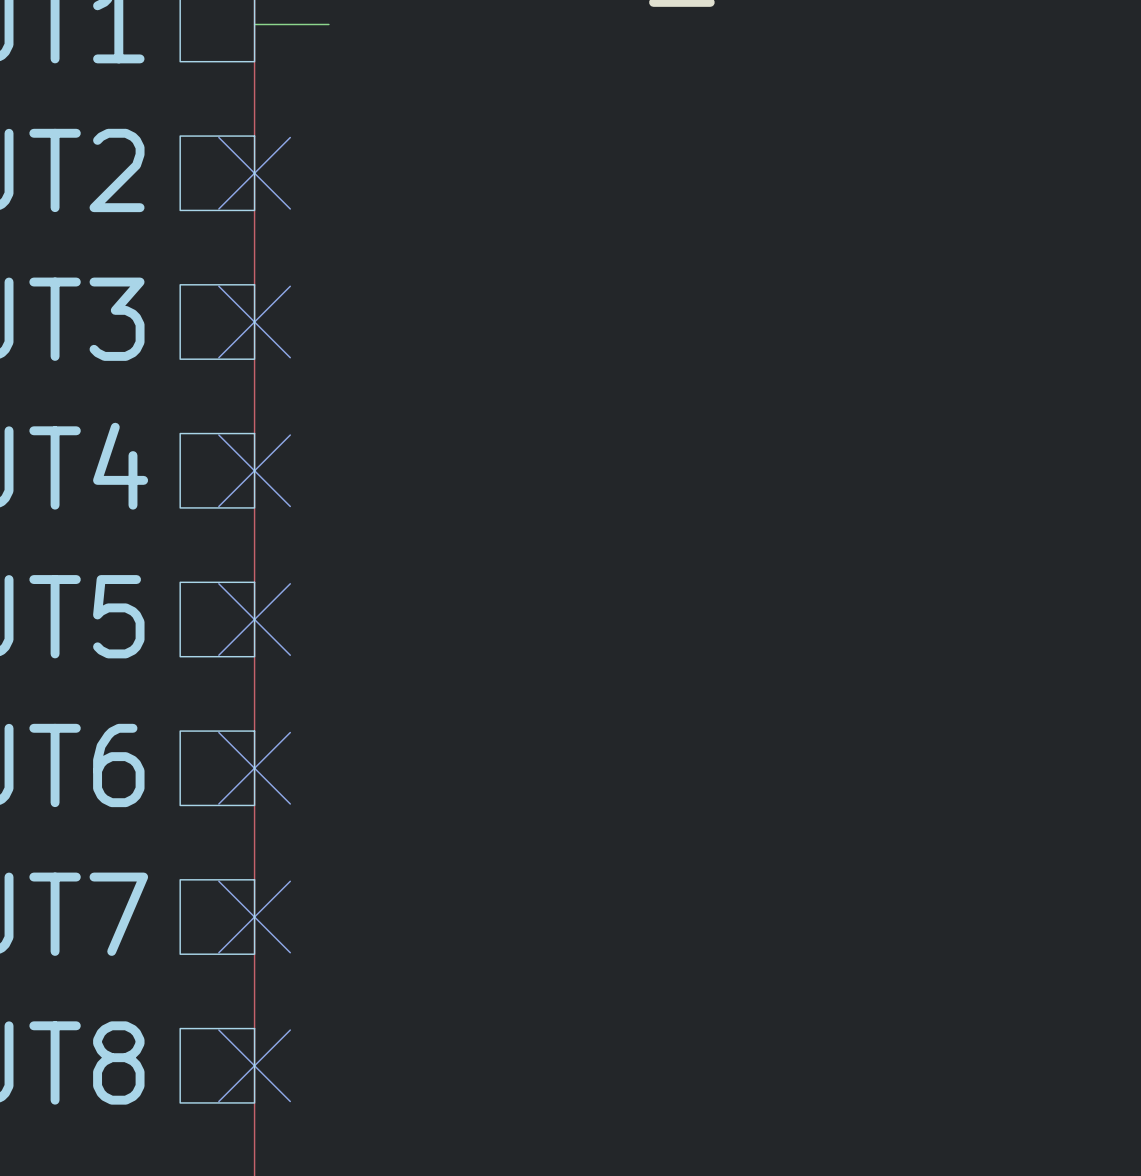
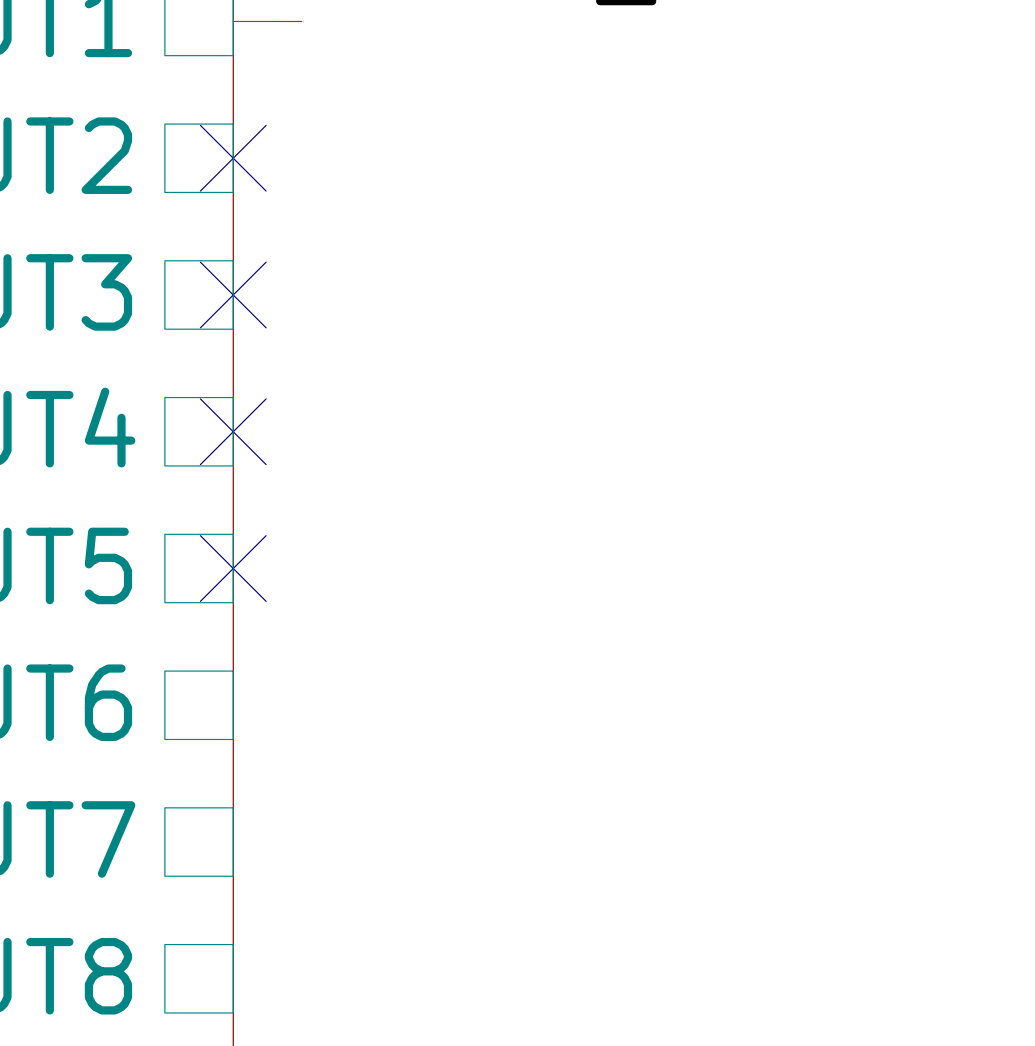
no-connect mark: (254, 768) -> none
no-connect mark: (254, 917) -> none
no-connect mark: (254, 1065) -> none

